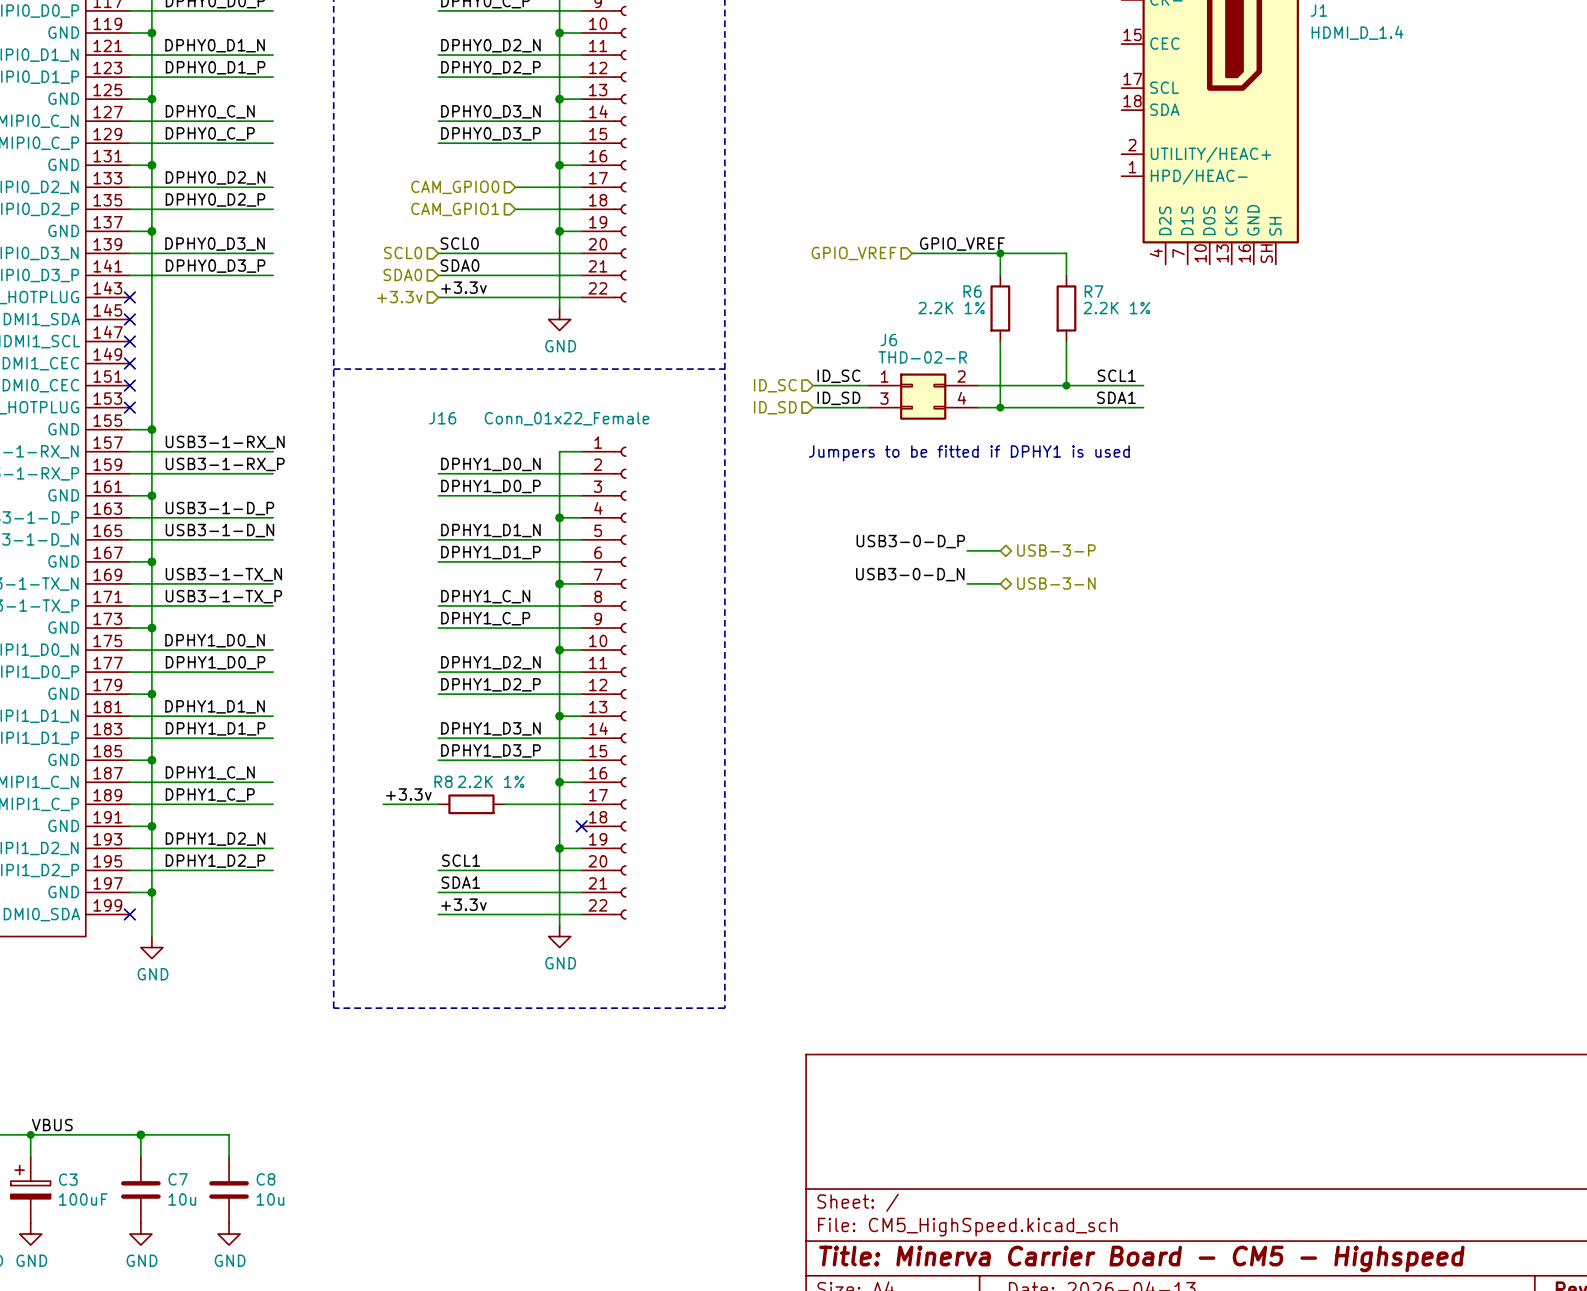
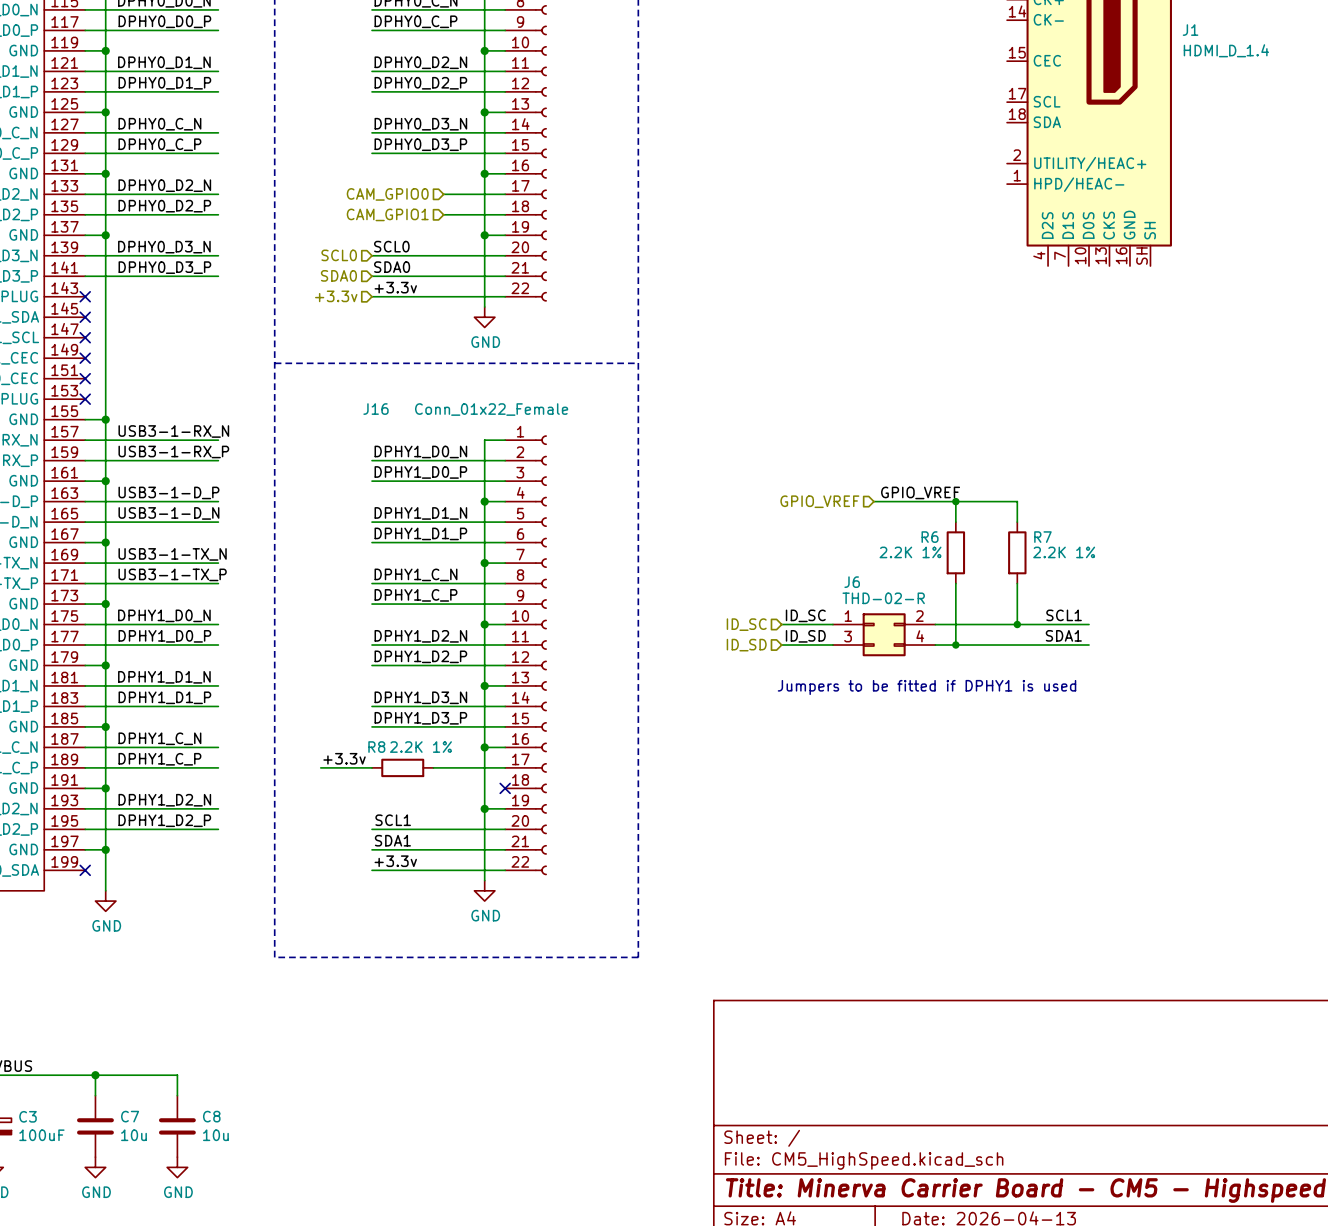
label: GPIO_VREF (962, 244) -> none
hierarchical label: GPIO_VREF (854, 253) -> none
wire: (912, 253) (1066, 253) (1066, 275) -> none
wire: (1000, 253) (1000, 275) -> none
junction: (1000, 253) -> none
R6 position: (1000, 308) -> (955, 552)
R7 position: (1066, 308) -> (1017, 552)
wire: (1000, 341) (1000, 407) -> none
wire: (1066, 341) (1066, 385) -> none
label: SCL1 (1116, 375) -> none
label: ID_SC (838, 376) -> none
hierarchical label: ID_SC (775, 385) -> none
wire: (813, 385) (868, 385) -> none
wire: (978, 385) (1143, 385) -> none
junction: (1066, 385) -> none
J6 position: (923, 396) -> (884, 634)
label: SDA1 (1116, 397) -> none
label: ID_SD (838, 398) -> none
hierarchical label: ID_SD (775, 407) -> none
wire: (813, 407) (868, 407) -> none
wire: (978, 407) (1143, 407) -> none
junction: (1000, 407) -> none
text: Jumpers to be fitted if DPHY1 is used (969, 453) -> none
label: none -> GPIO_VREF (920, 492)
hierarchical label: none -> GPIO_VREF (819, 501)
wire: none -> (873, 501) (1017, 501) (1017, 522)
wire: none -> (955, 501) (955, 522)
junction: none -> (955, 501)
label: USB3-0-D_P (910, 541) -> none
wire: (967, 550) (1000, 550) -> none
hierarchical label: USB-3-P (1056, 550) -> none
label: USB3-0-D_N (910, 574) -> none
wire: (967, 583) (1000, 583) -> none
hierarchical label: USB-3-N (1056, 583) -> none
wire: none -> (955, 583) (955, 645)
wire: none -> (1017, 583) (1017, 624)
label: none -> ID_SC (805, 615)
label: none -> SCL1 (1064, 615)
hierarchical label: none -> ID_SC (746, 624)
wire: none -> (781, 624) (832, 624)
wire: none -> (935, 624) (1089, 624)
junction: none -> (1017, 624)
label: none -> ID_SD (805, 636)
label: none -> SDA1 (1063, 635)
hierarchical label: none -> ID_SD (746, 645)
wire: none -> (781, 645) (832, 645)
wire: none -> (935, 645) (1089, 645)
junction: none -> (955, 645)
text: none -> Jumpers to be fitted if DPHY1 is used (927, 687)

